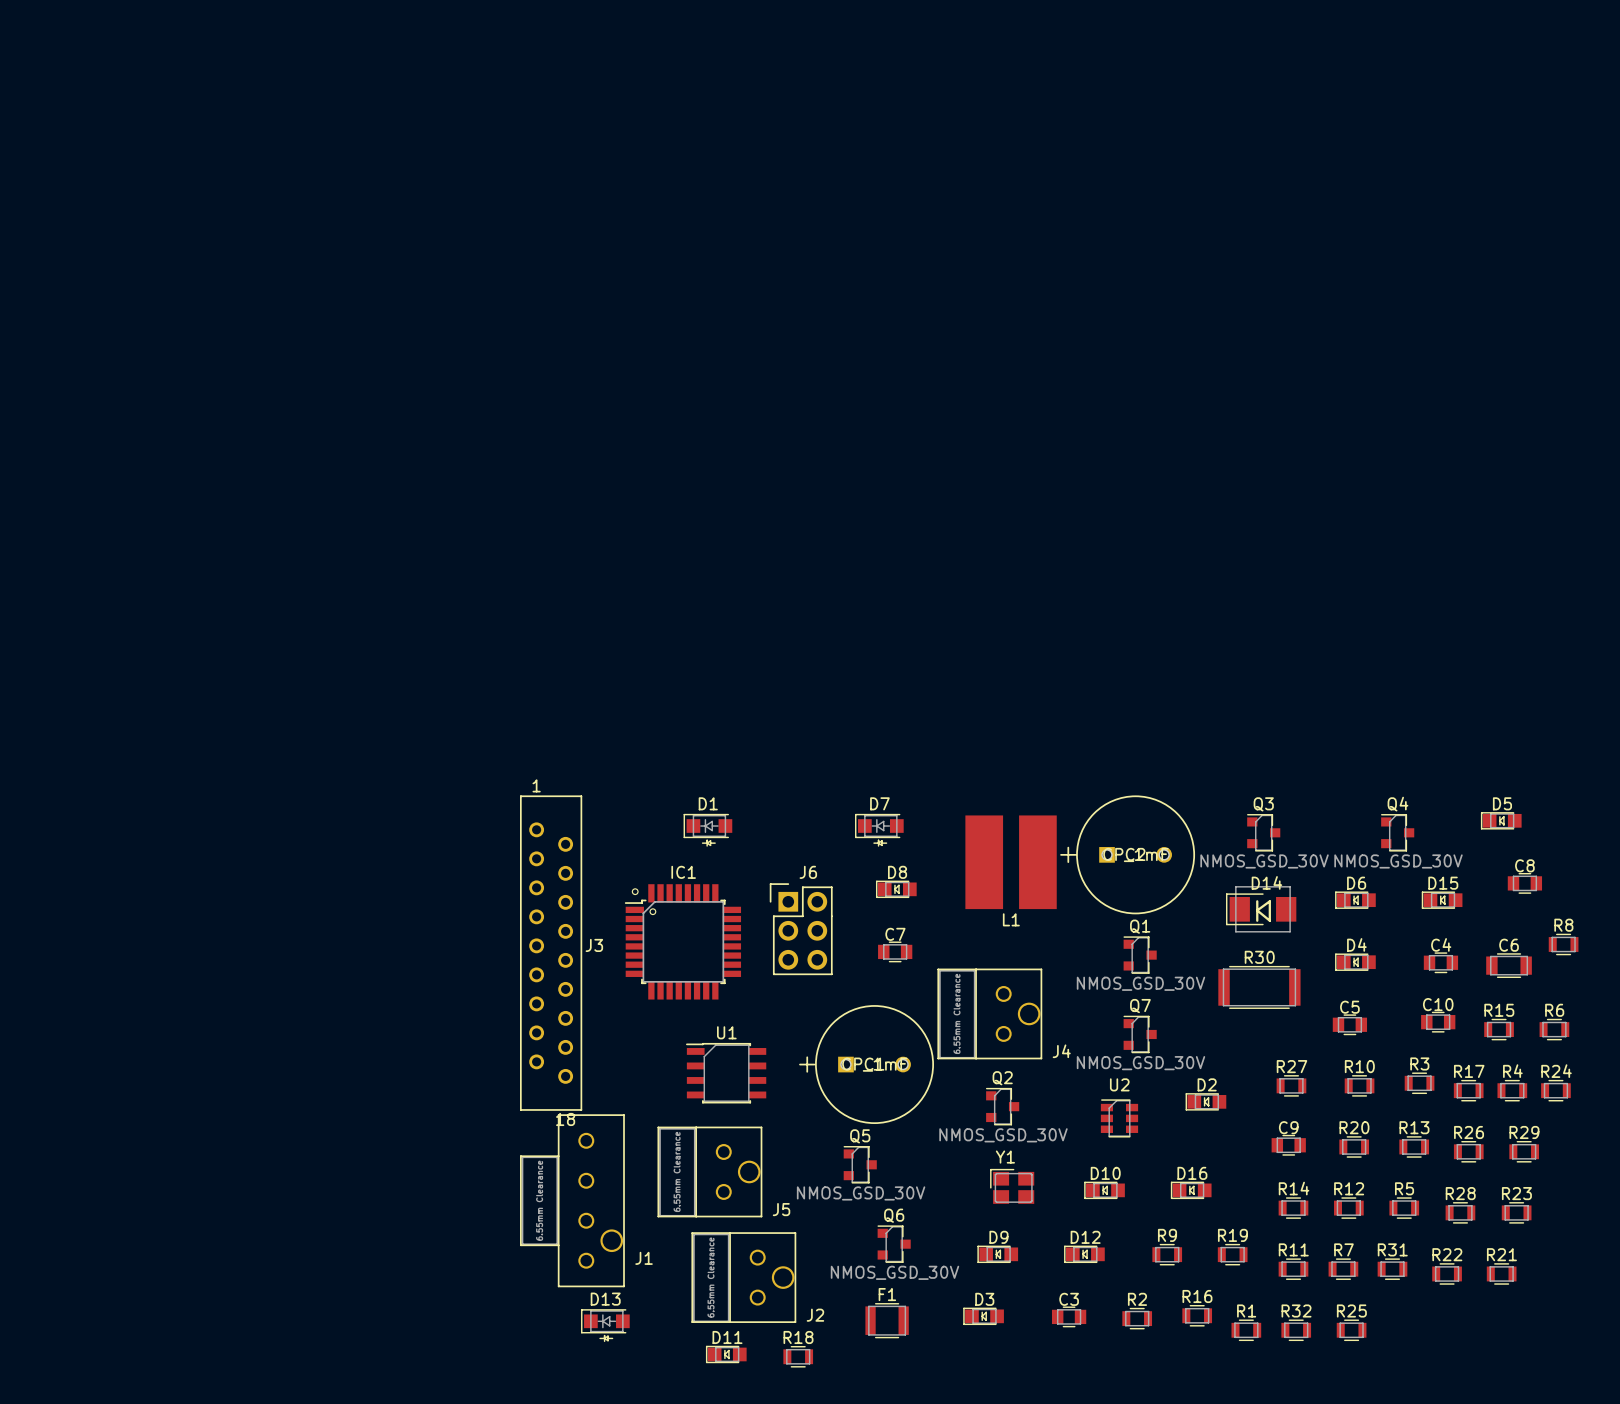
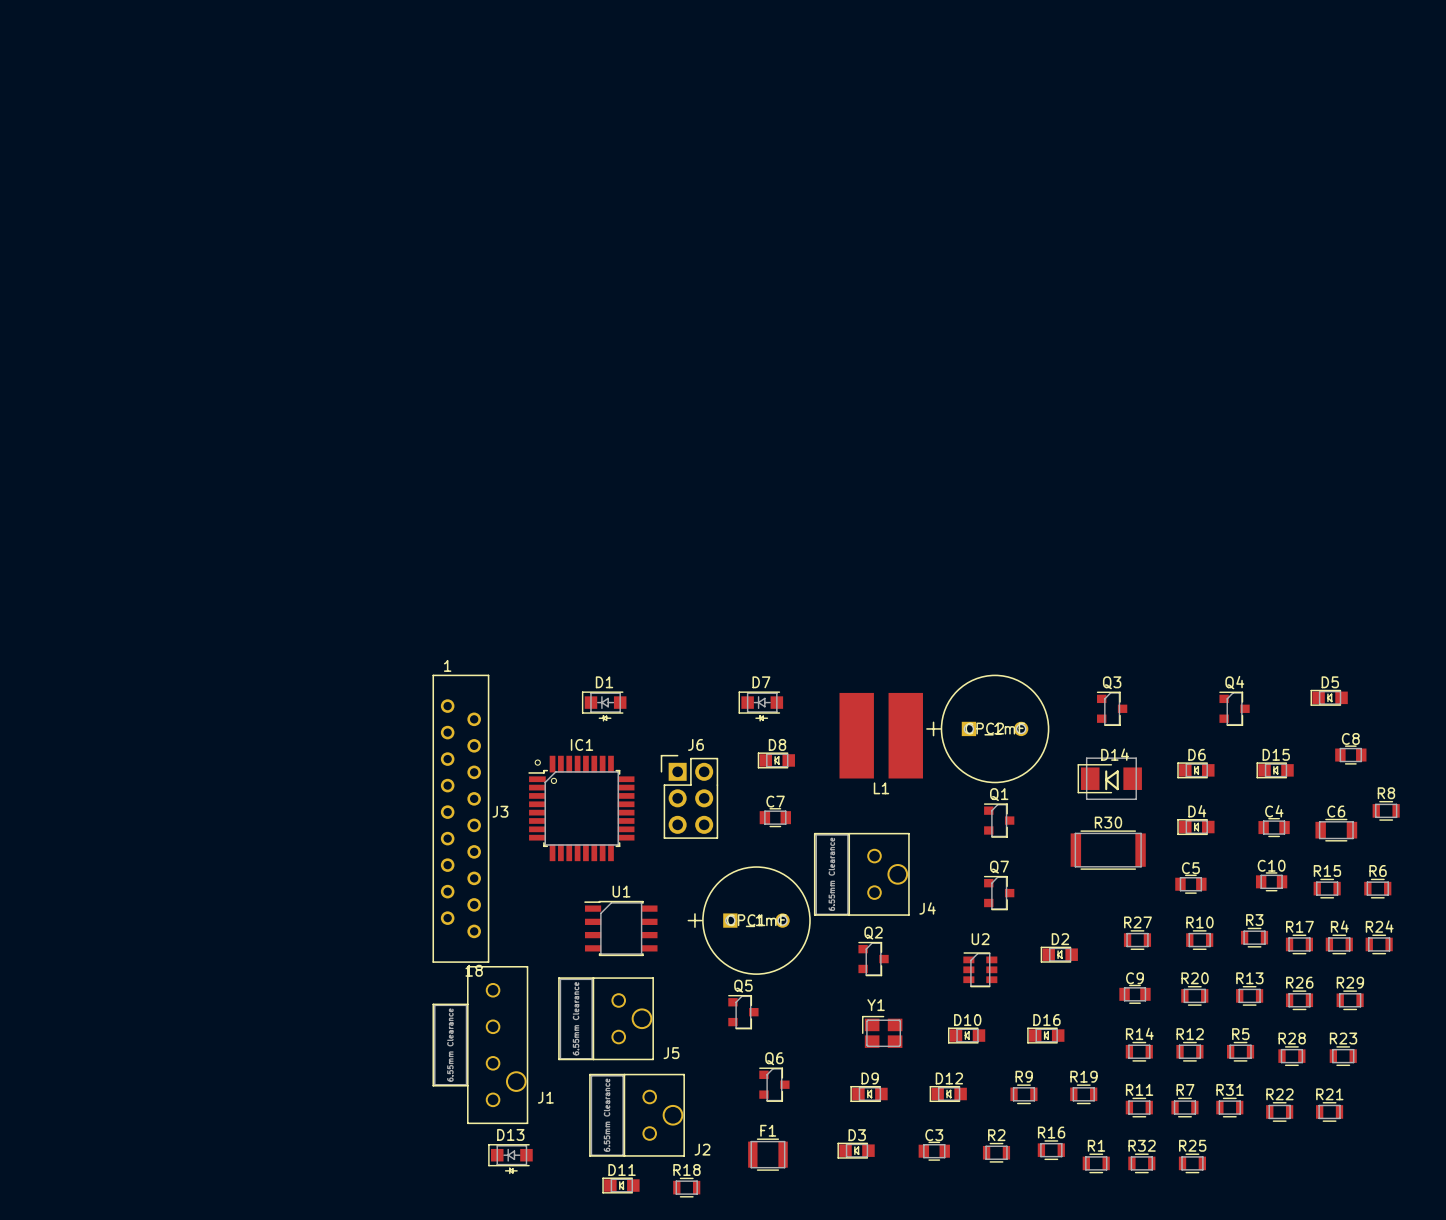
Q3 value: NMOS_GSD_30V (1264, 861) -> none
Q4 value: NMOS_GSD_30V (1398, 861) -> none
Q1 value: NMOS_GSD_30V (1140, 983) -> none
Q7 value: NMOS_GSD_30V (1140, 1063) -> none
Q2 value: NMOS_GSD_30V (1003, 1135) -> none
Q5 value: NMOS_GSD_30V (861, 1193) -> none
Q6 value: NMOS_GSD_30V (894, 1272) -> none

